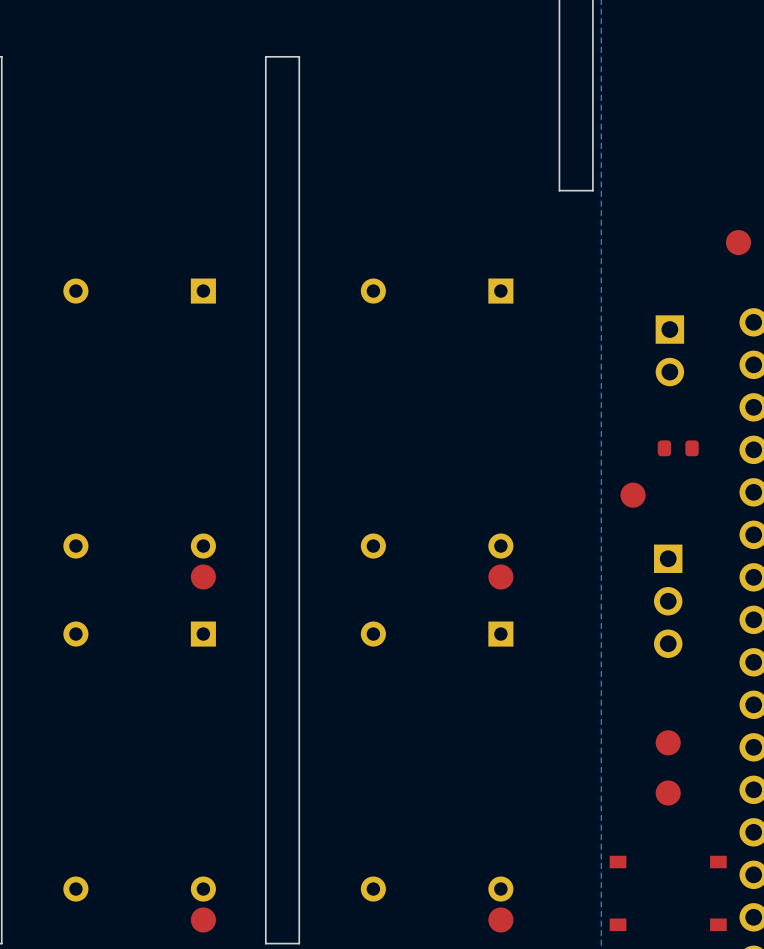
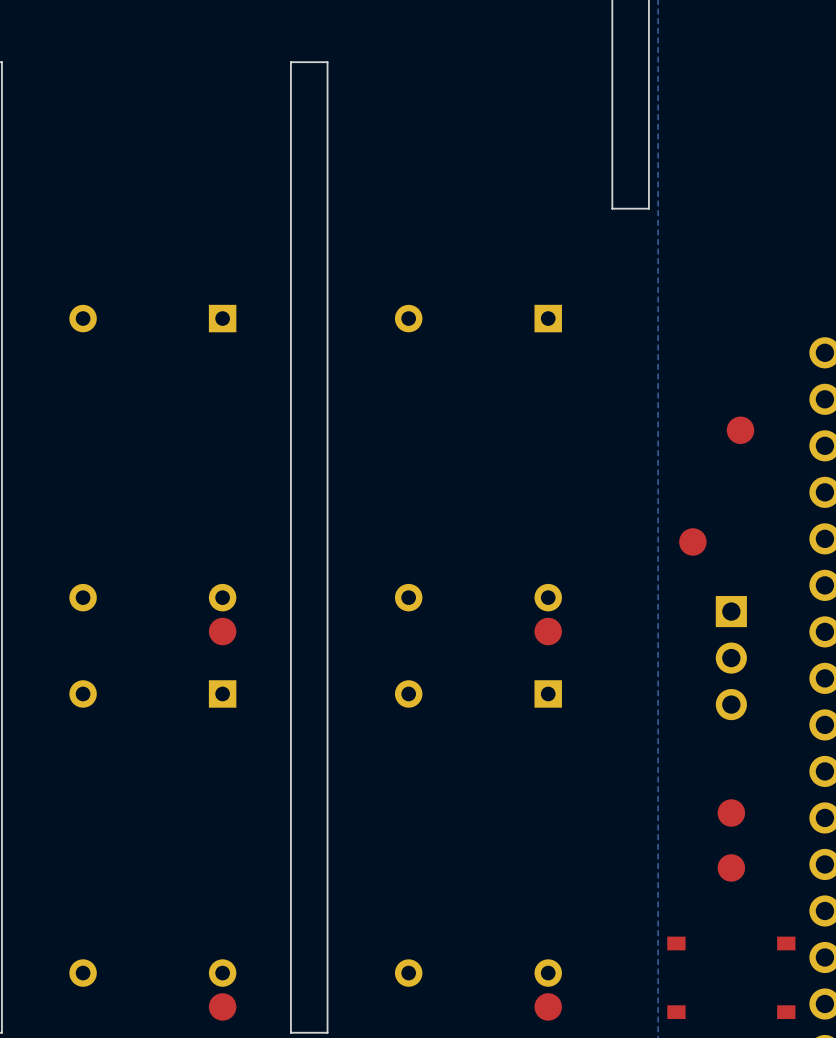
part position: (738, 242) -> (740, 430)
part: (669, 350) -> none
part: (678, 448) -> none

